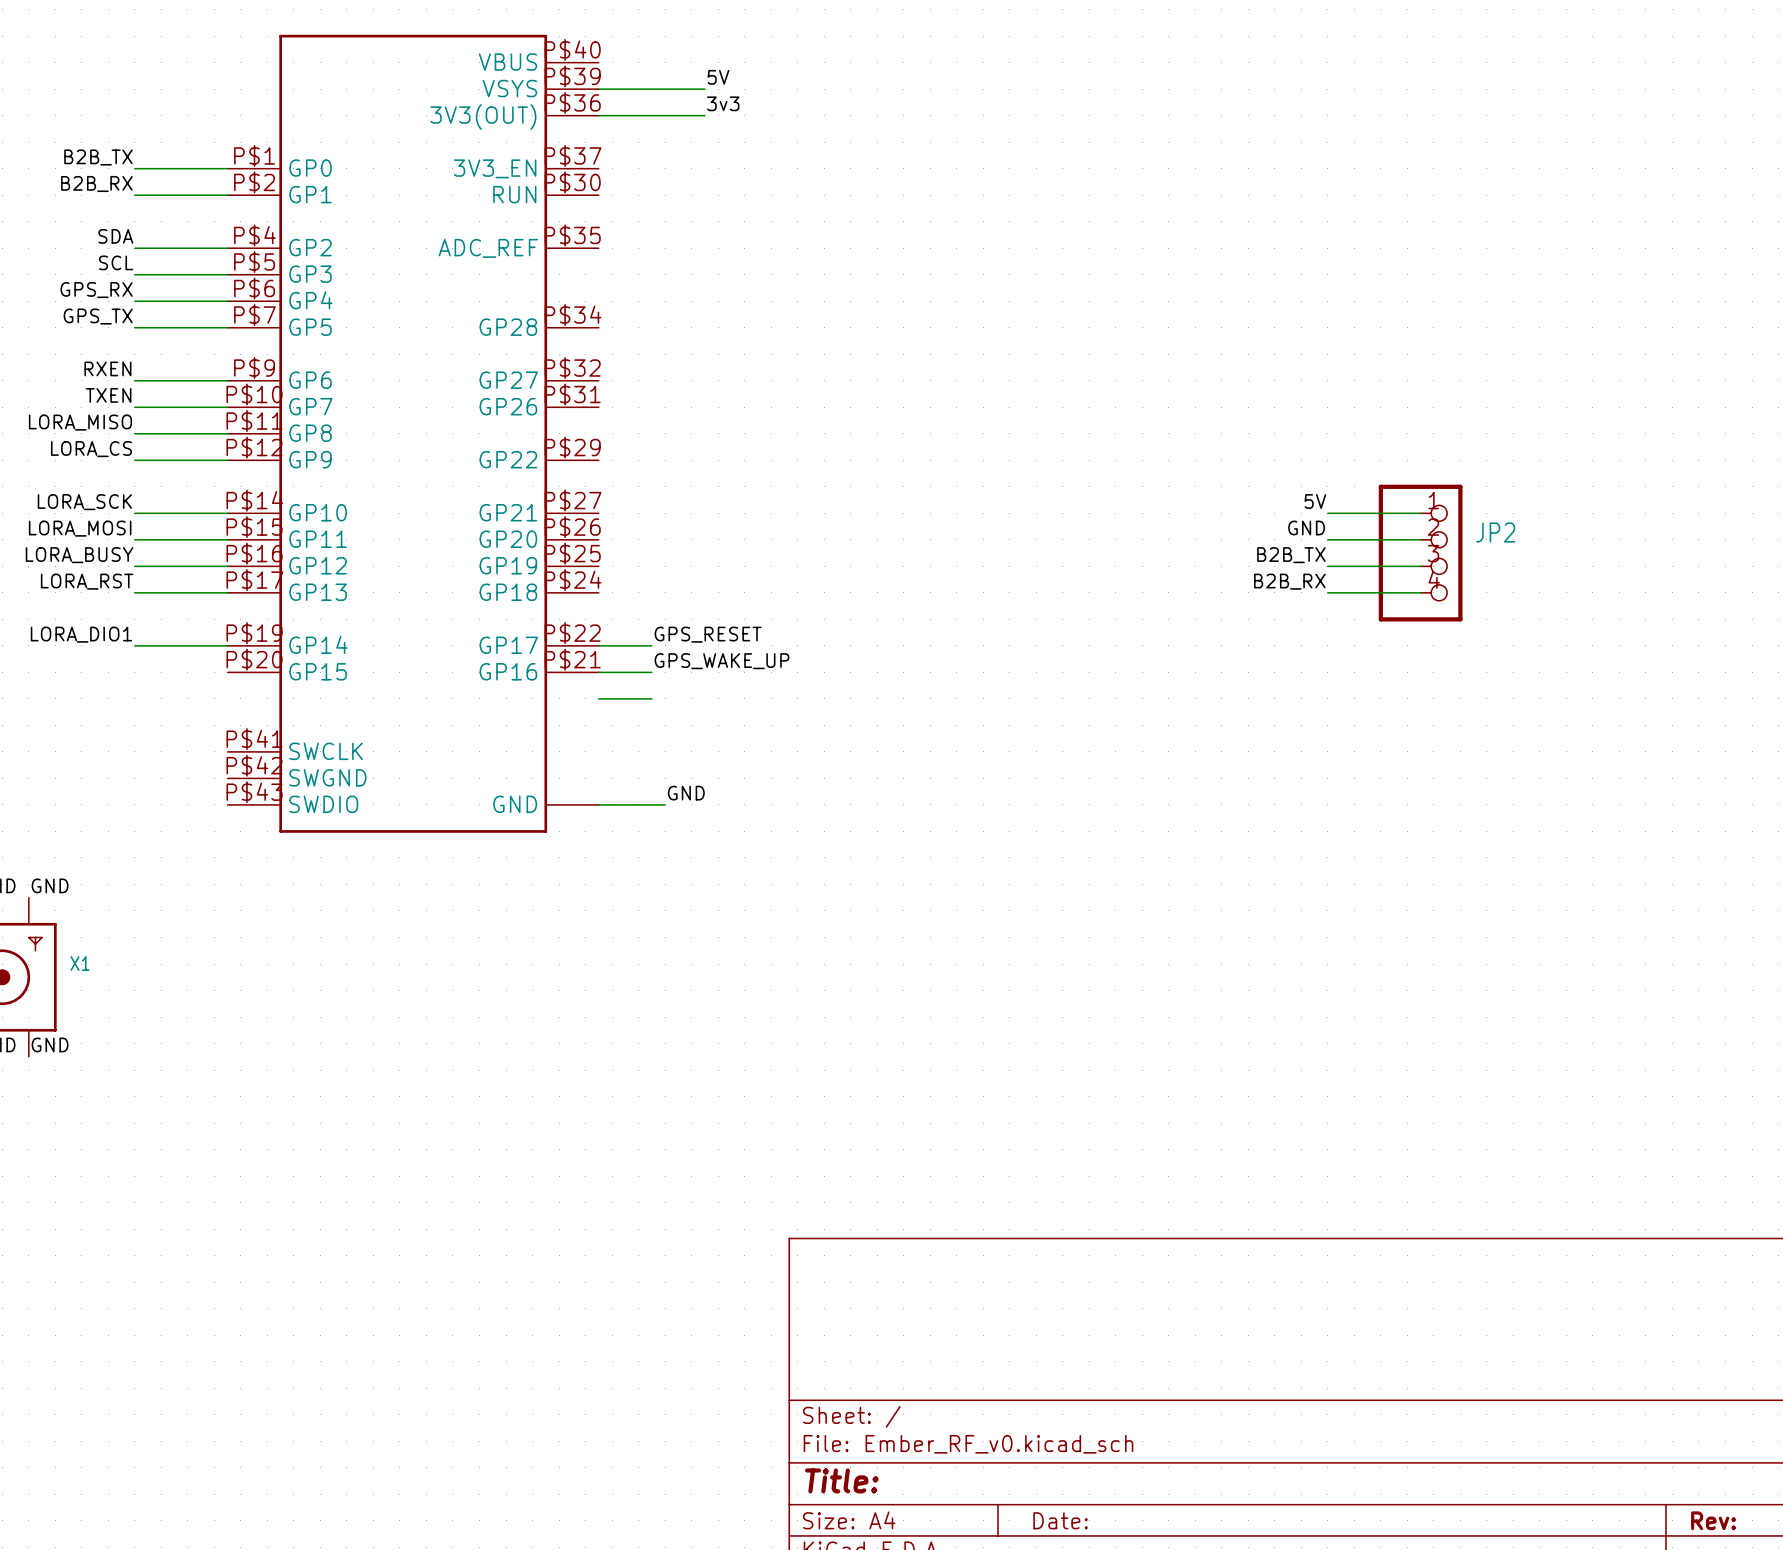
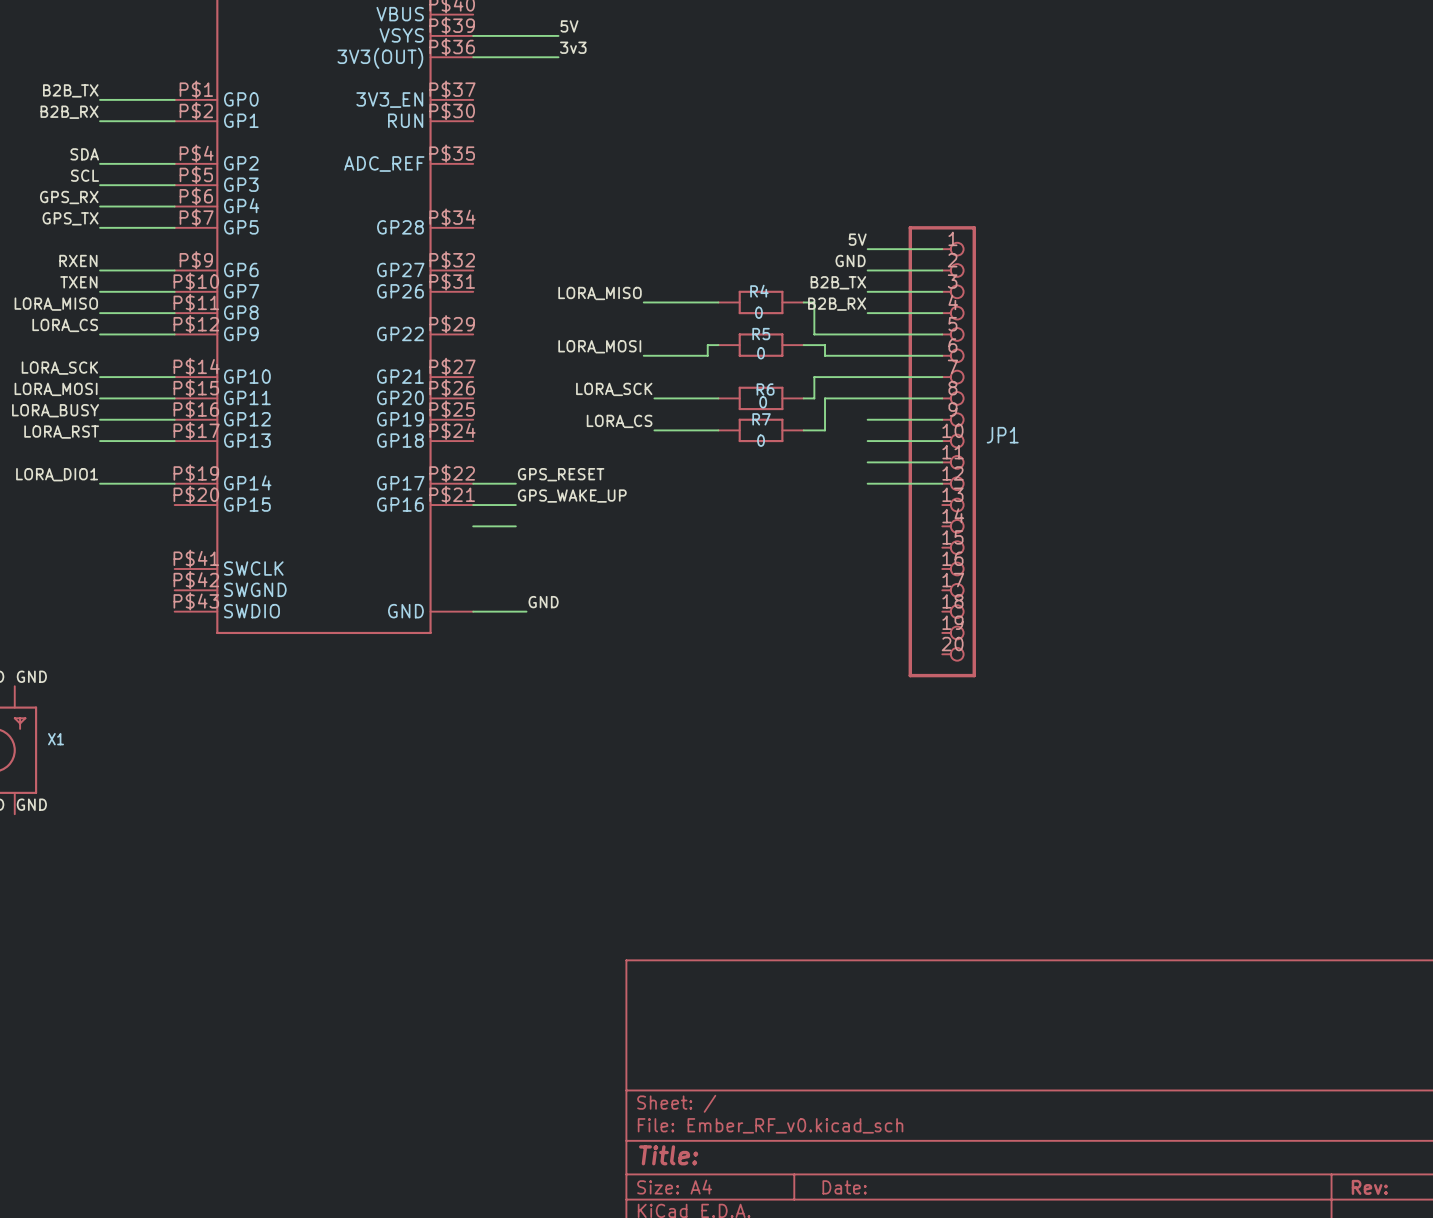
label: none -> 5V (857, 239)
wire: none -> (867, 249) (942, 249)
label: none -> GND (850, 260)
wire: none -> (867, 270) (942, 270)
label: none -> B2B_TX (838, 282)
wire: none -> (867, 291) (942, 291)
label: none -> LORA_MISO (600, 293)
wire: none -> (643, 302) (718, 302)
R4: none -> 0 (761, 302)
wire: none -> (803, 302) (814, 302) (814, 334) (942, 334)
label: none -> B2B_RX (837, 304)
wire: none -> (867, 313) (942, 313)
wire: none -> (718, 345) (707, 345) (707, 355) (643, 355)
R5: none -> 0 (761, 345)
wire: none -> (803, 345) (825, 345) (825, 355) (942, 355)
label: none -> LORA_MOSI (599, 346)
label: 5V (1315, 501) -> none
wire: none -> (942, 377) (814, 377) (814, 398) (803, 398)
wire: (1327, 513) (1420, 513) -> (867, 419) (942, 419)
label: none -> LORA_SCK (614, 389)
label: GND (1306, 528) -> none
wire: none -> (654, 398) (718, 398)
R6: none -> 0 (761, 398)
wire: none -> (942, 398) (825, 398) (825, 430) (803, 430)
wire: (1327, 539) (1420, 539) -> (867, 441) (942, 441)
JP2: (1420, 553) -> none
label: B2B_TX (1291, 555) -> none
wire: (1327, 566) (1420, 566) -> (867, 462) (942, 462)
label: none -> LORA_CS (619, 421)
wire: none -> (654, 430) (718, 430)
R7: none -> 0 (761, 430)
label: B2B_RX (1289, 581) -> none
wire: (1327, 592) (1420, 592) -> (867, 483) (942, 483)
JP1: none -> (942, 451)

